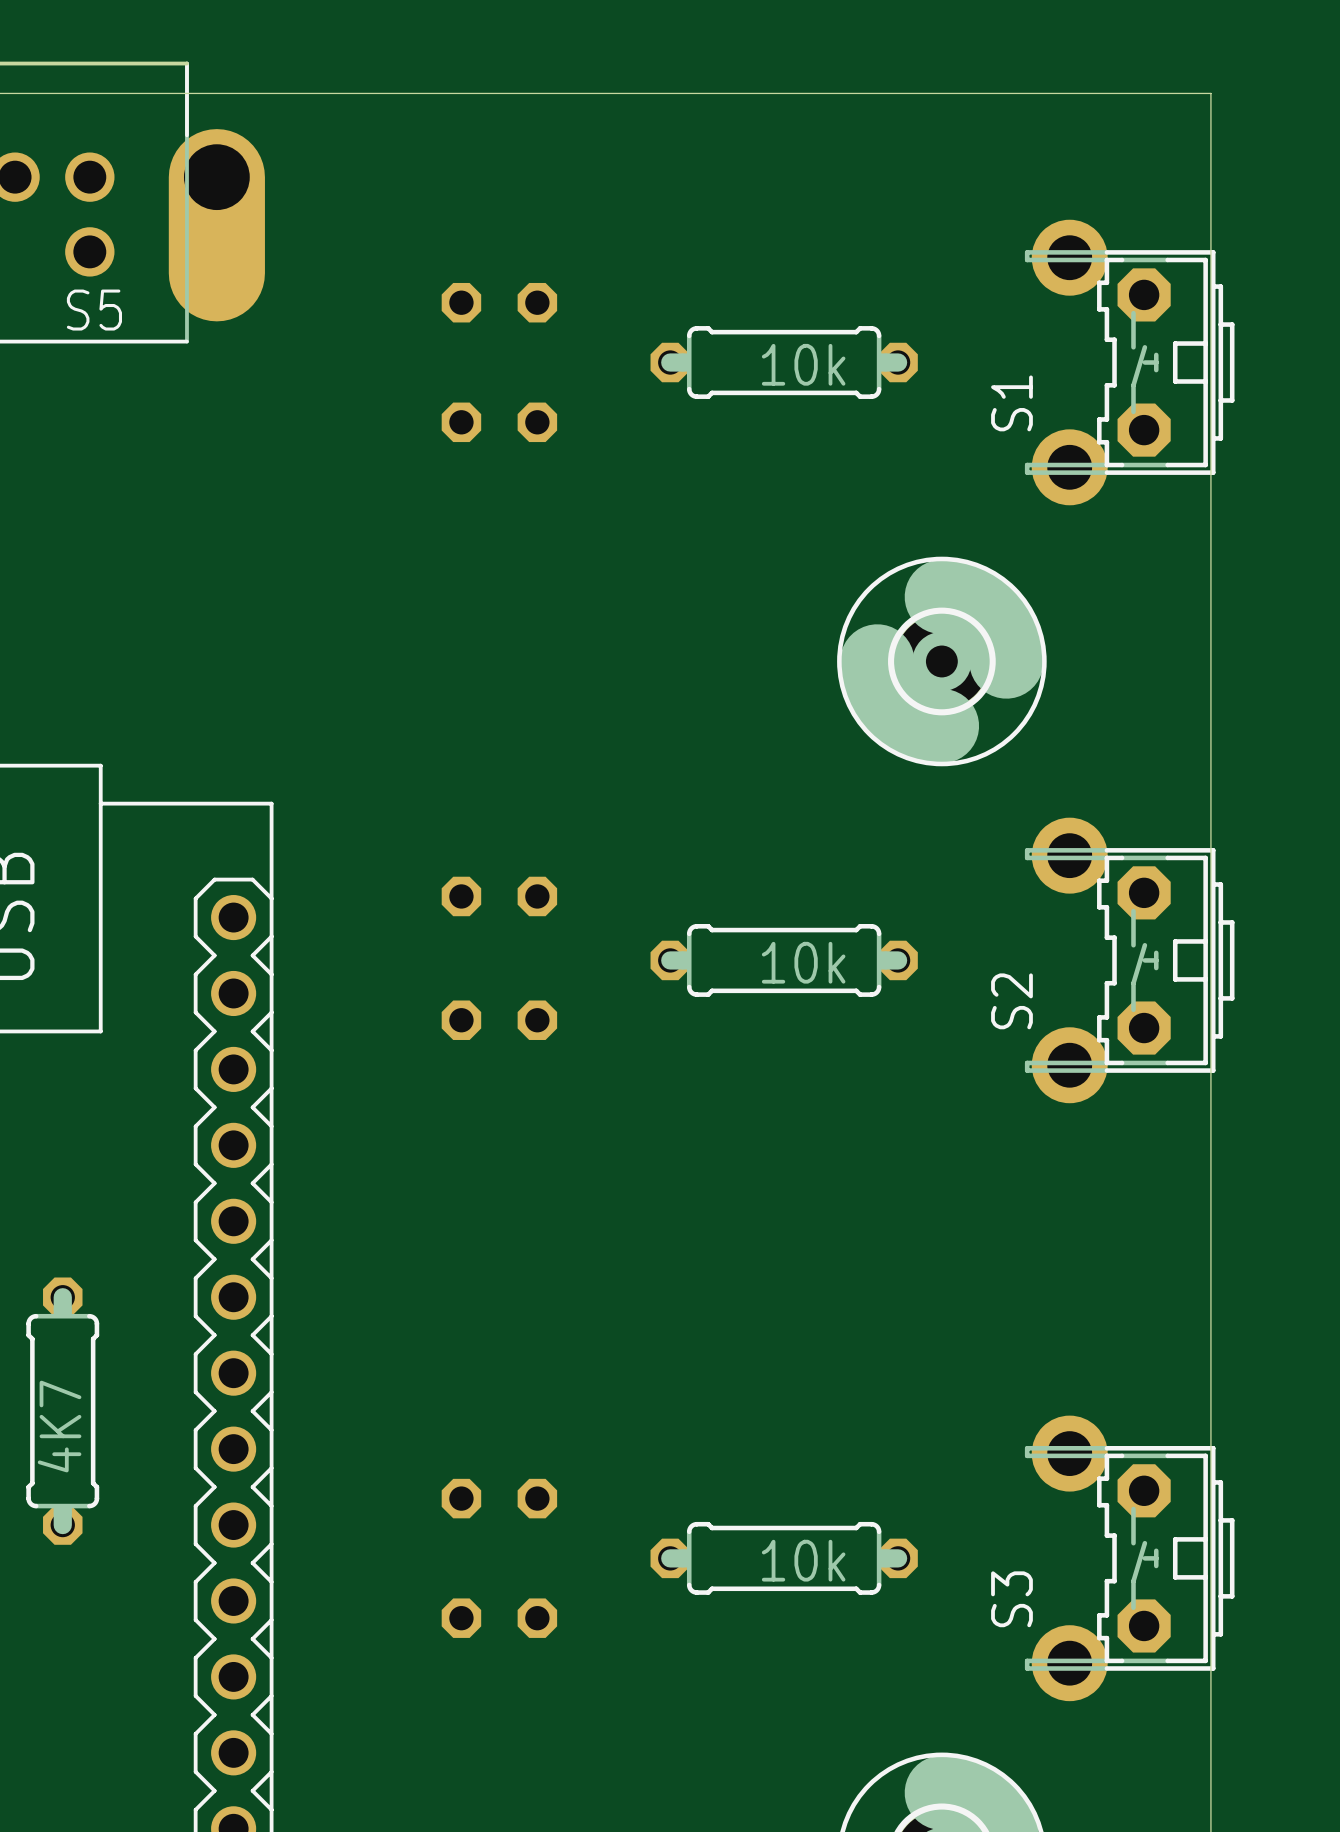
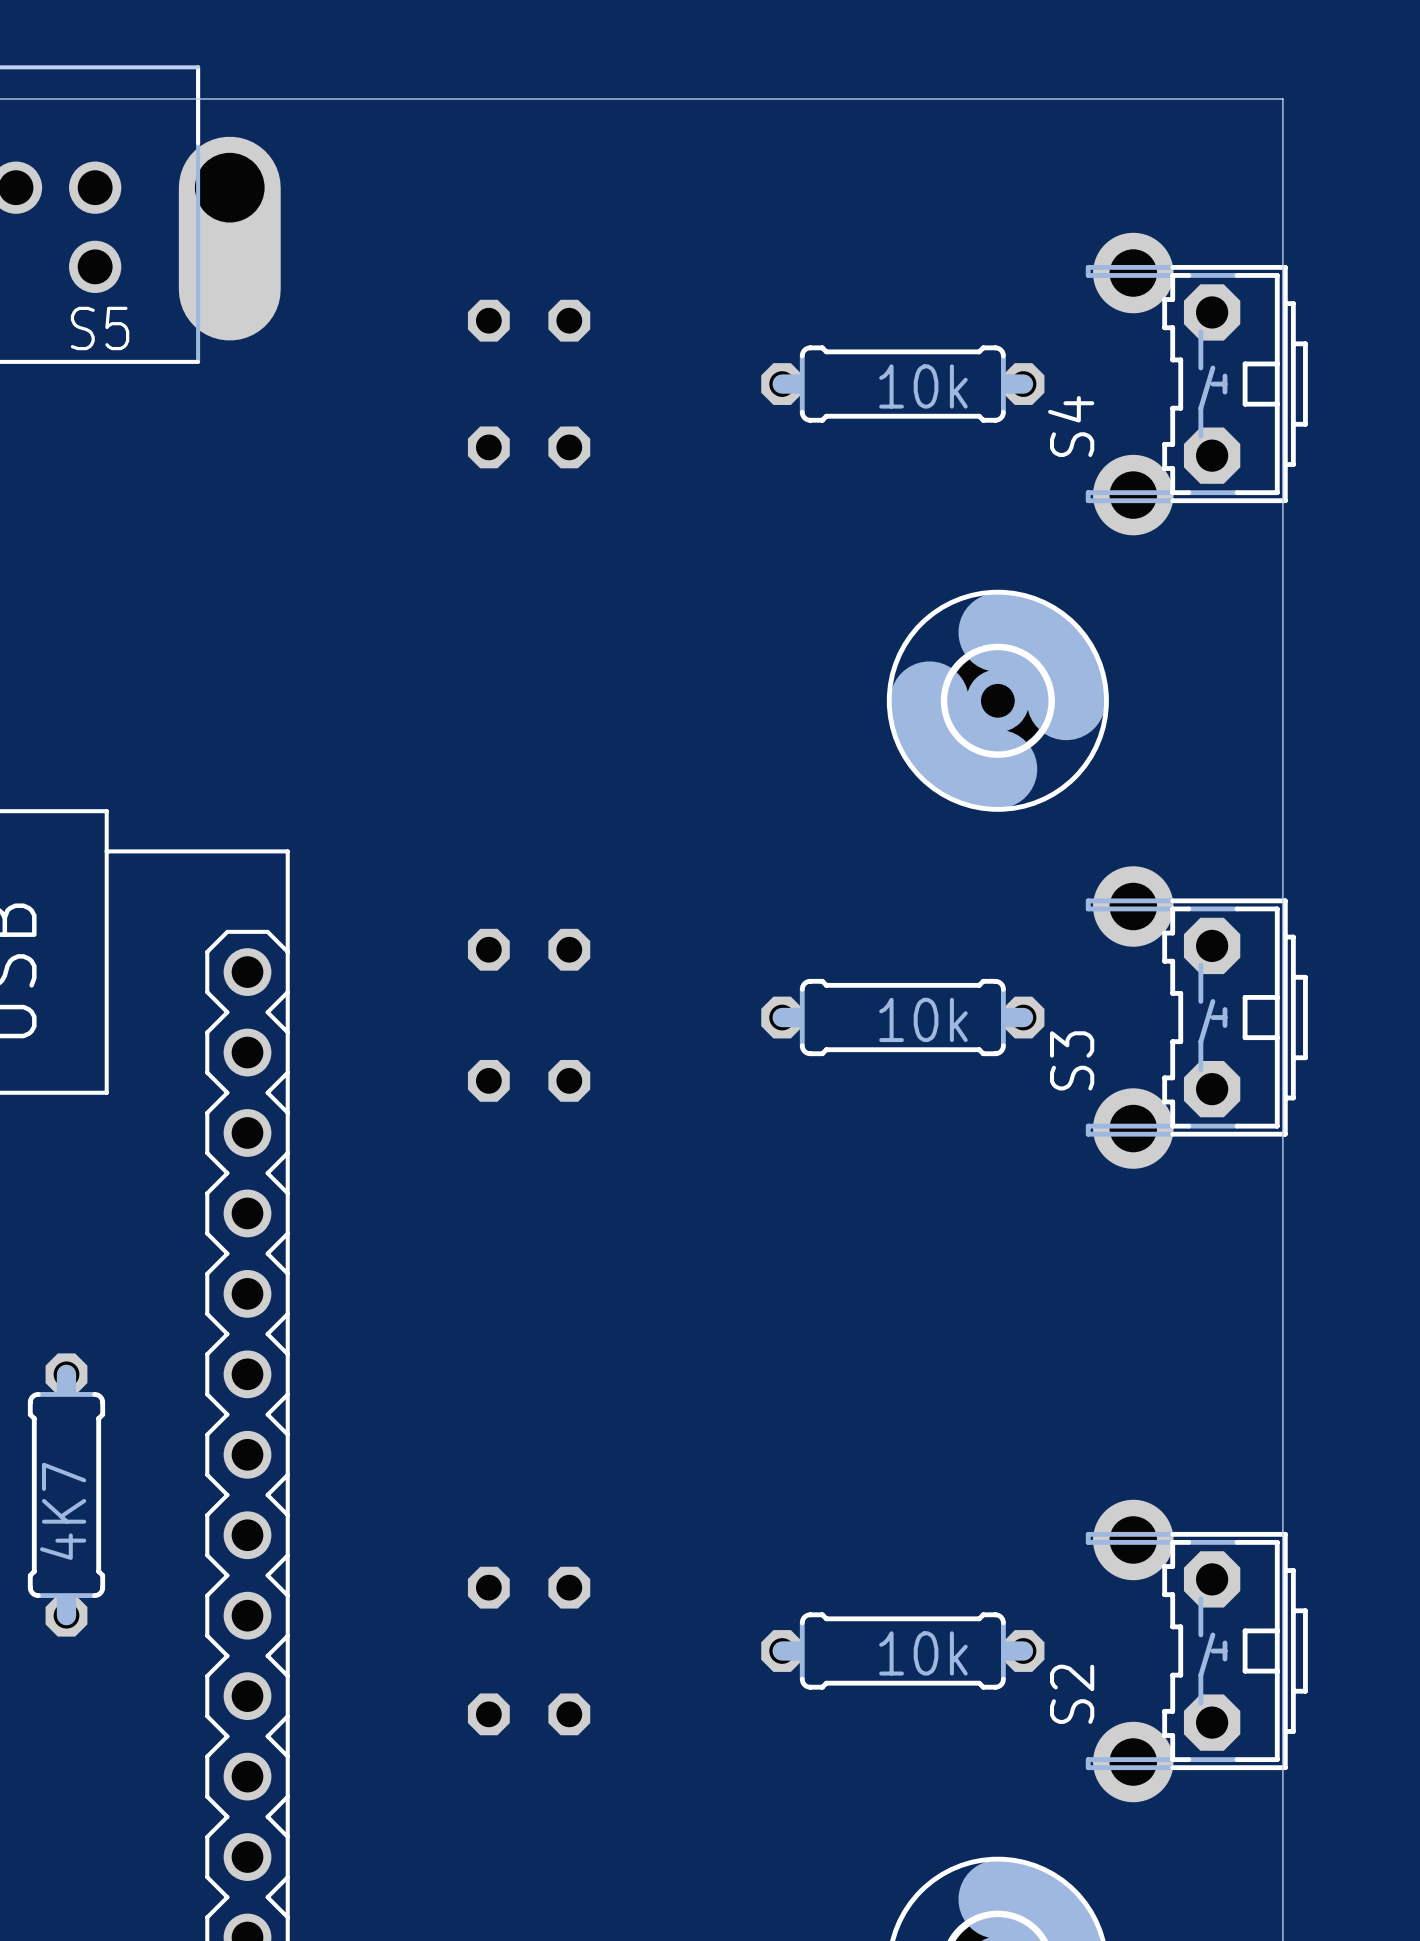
part position: (784, 362) -> (902, 384)
S1 name: S1 (1011, 403) -> S4 (1071, 426)
part position: (784, 960) -> (902, 1017)
S2 name: S2 (1011, 1001) -> S3 (1072, 1060)
part position: (784, 1558) -> (902, 1651)
S3 name: S3 (1011, 1599) -> S2 (1072, 1694)

